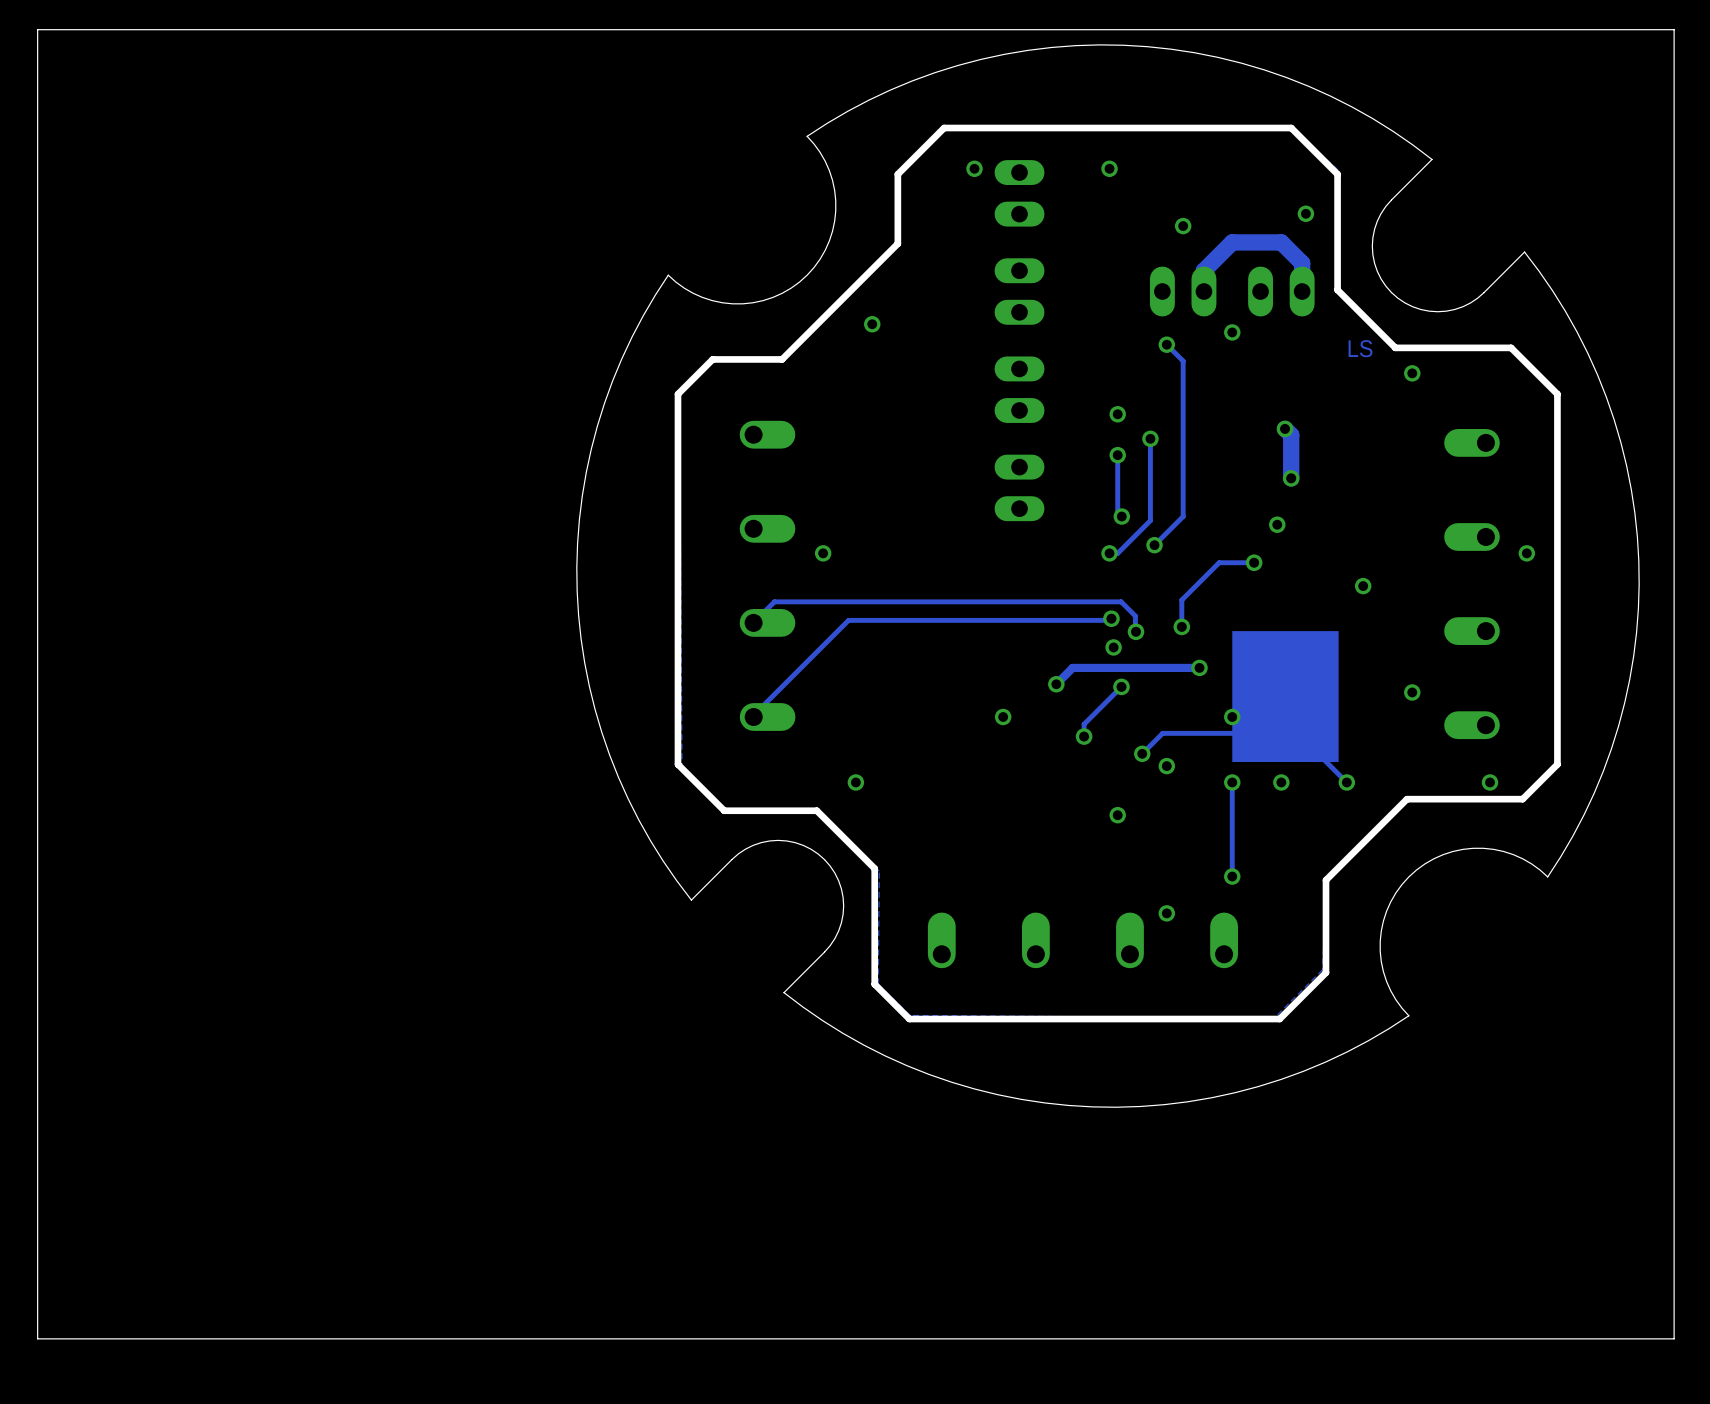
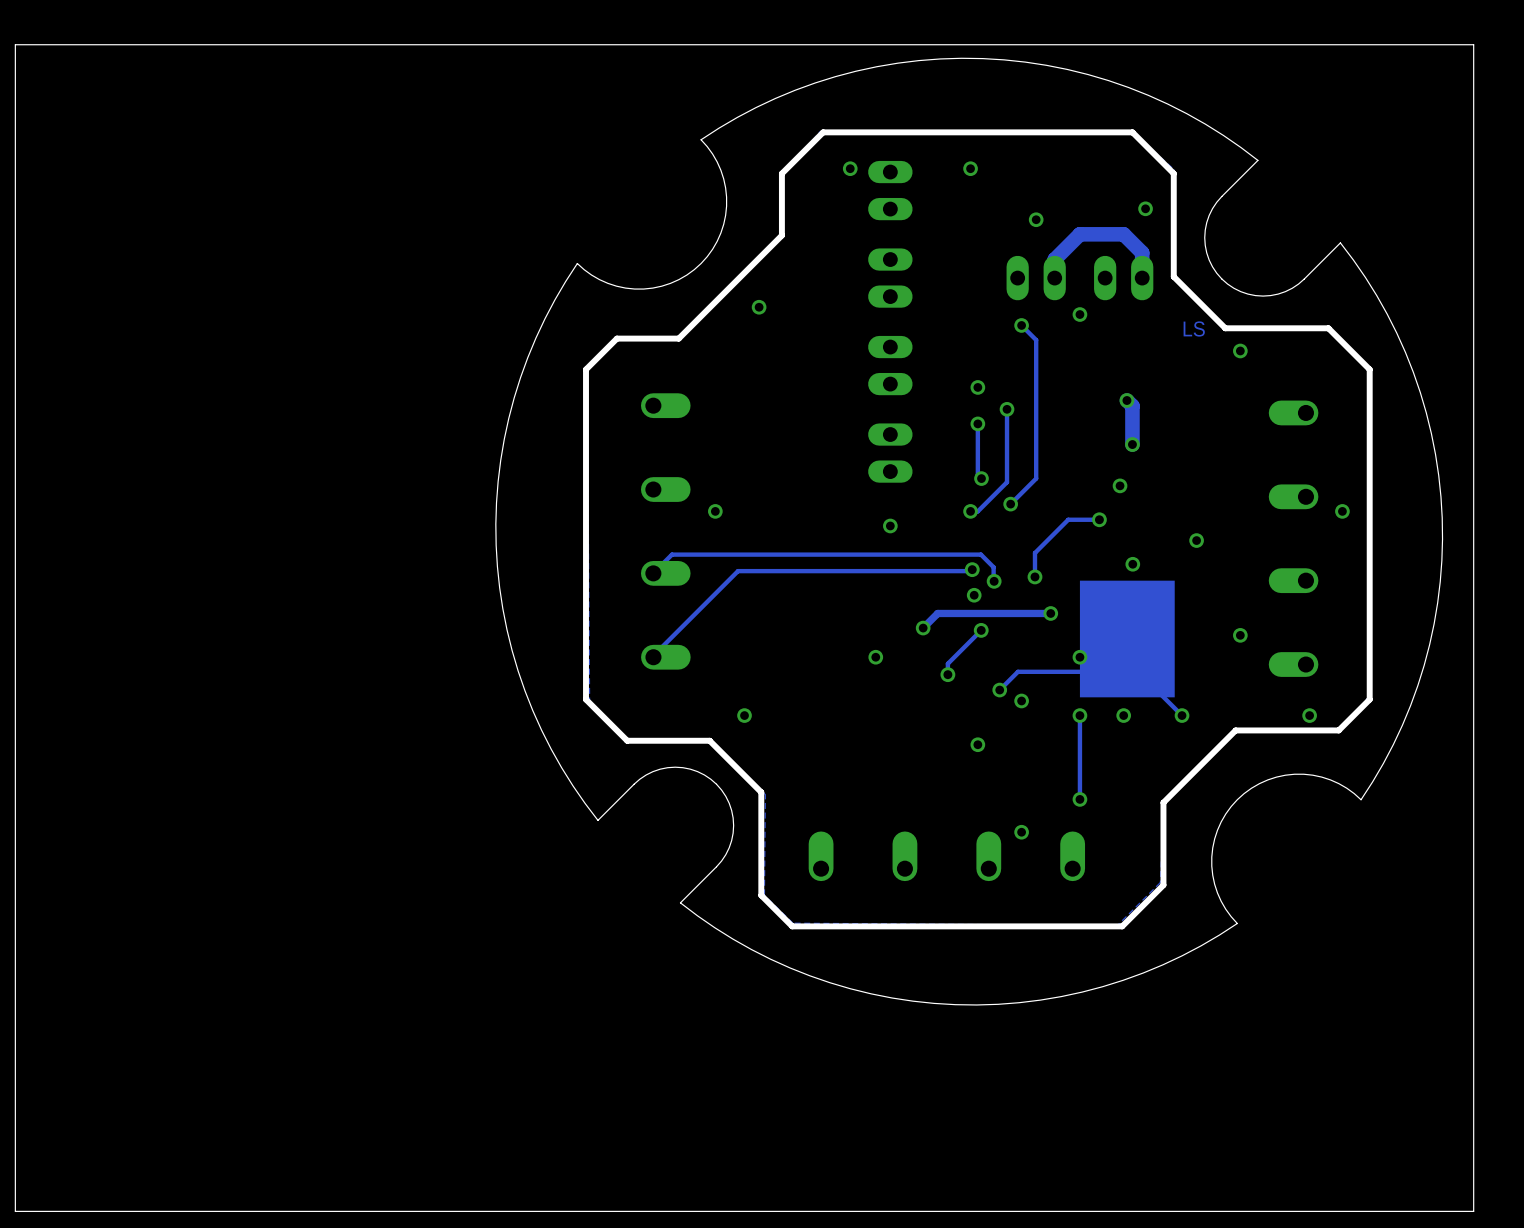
via: none -> (890, 525)
via: none -> (1132, 564)

